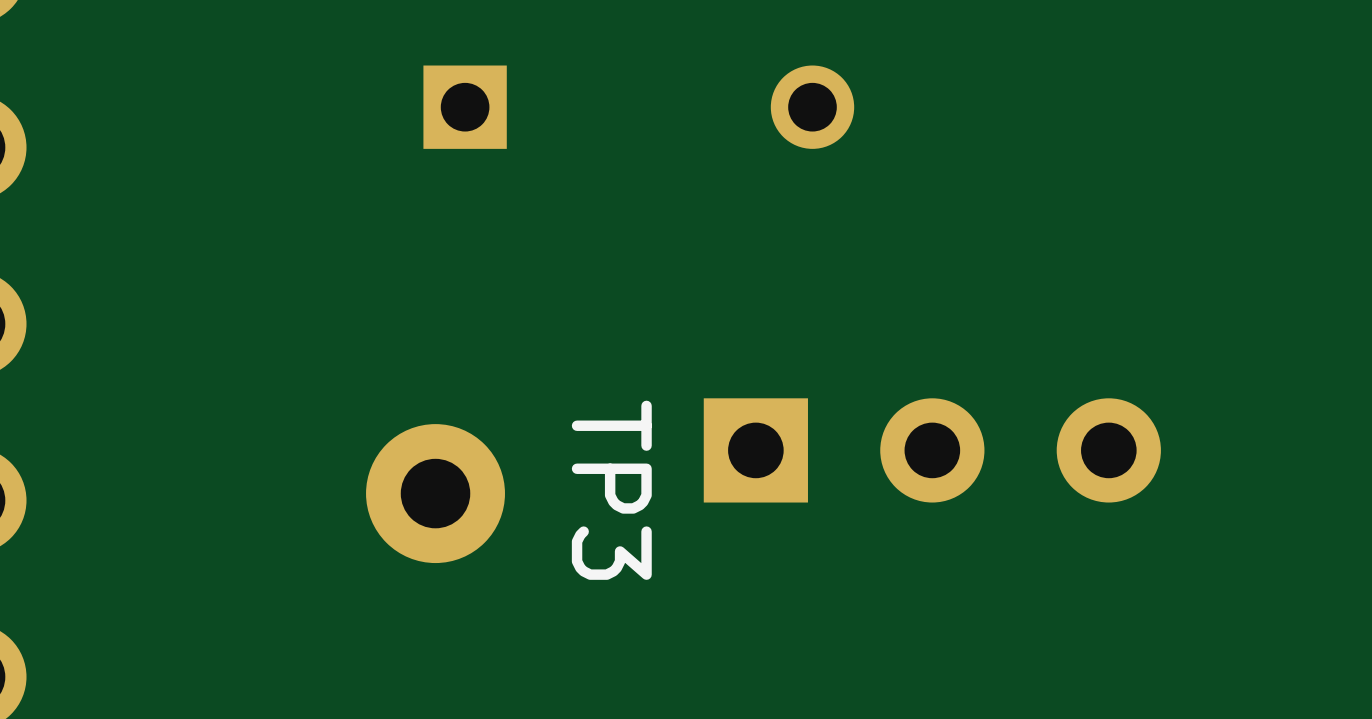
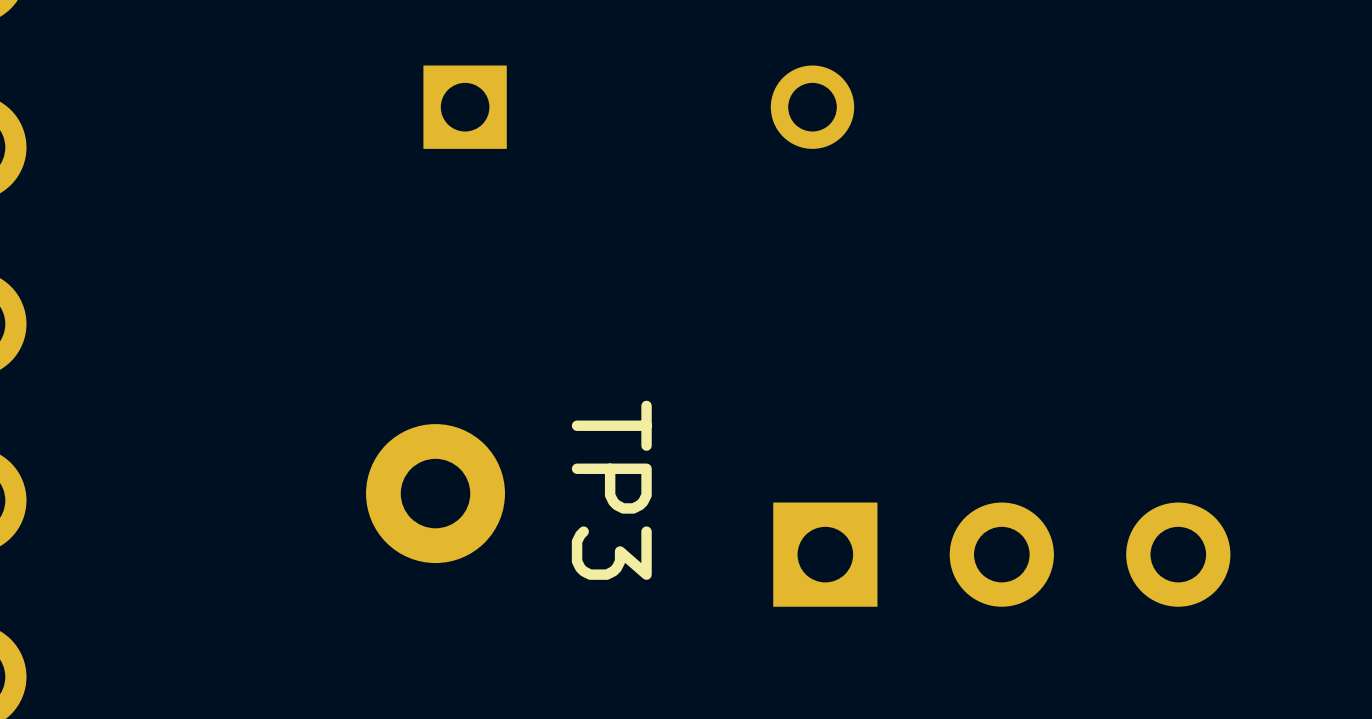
part position: (932, 450) -> (1001, 554)

